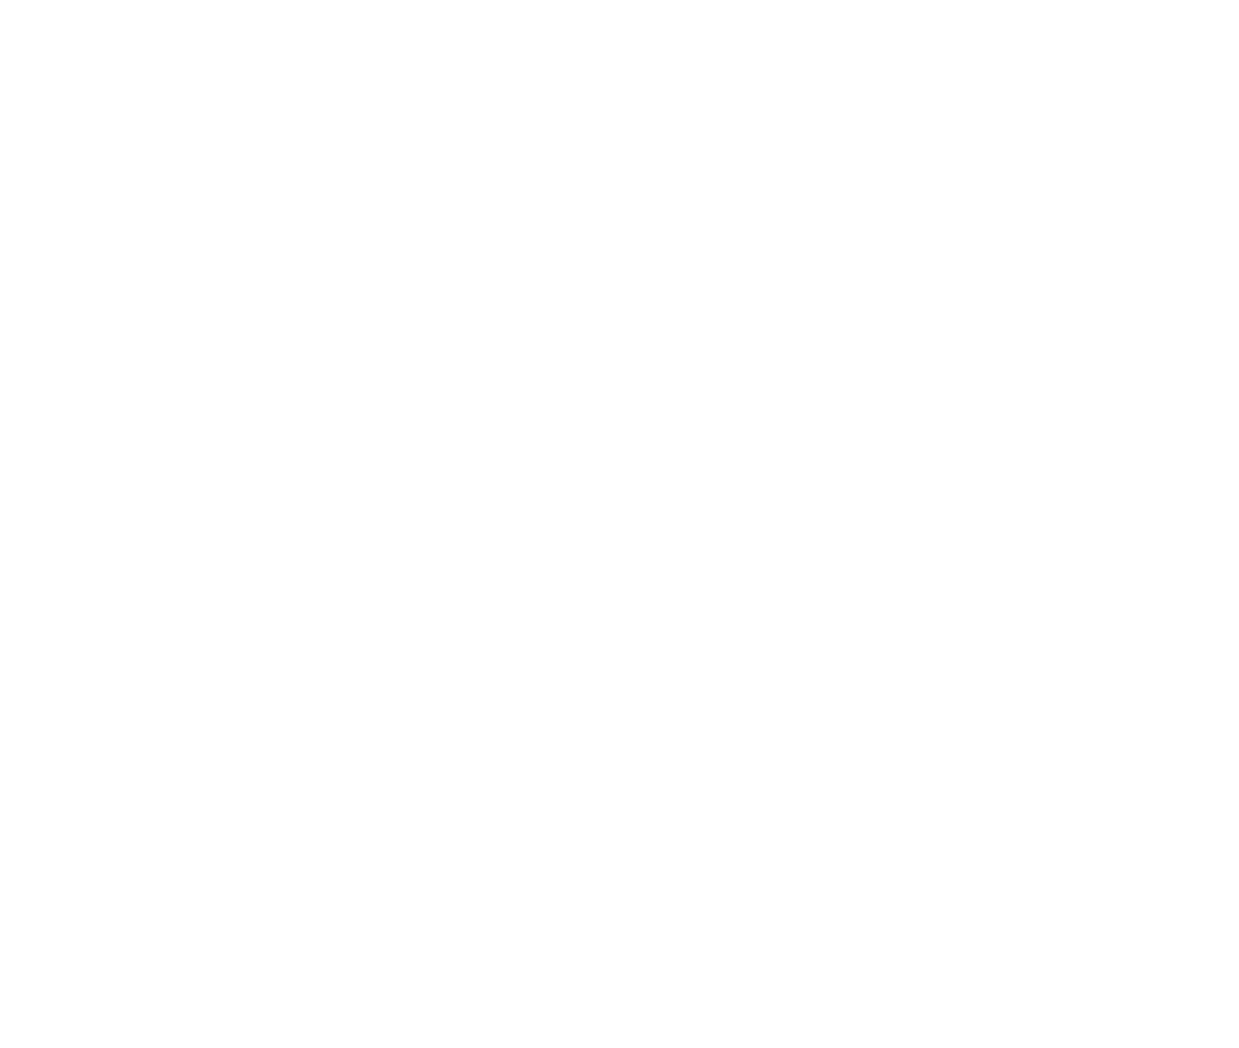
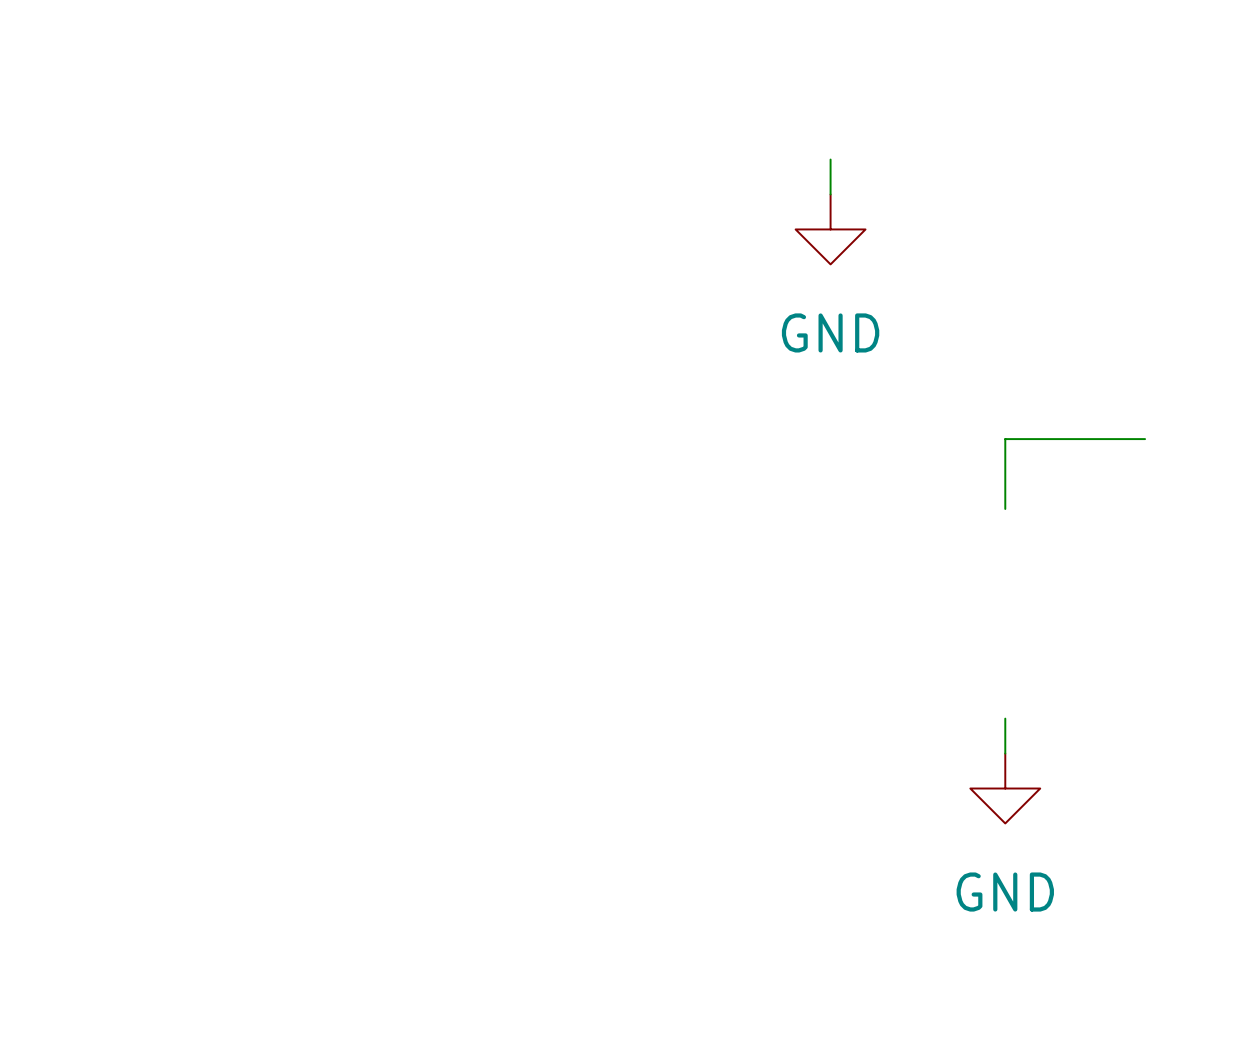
wire: none -> (830, 159) (830, 194)
power symbol: none -> GND (830, 229)
wire: none -> (1145, 439) (1005, 439) (1005, 508)
wire: none -> (1005, 718) (1005, 753)
power symbol: none -> GND (1005, 788)

